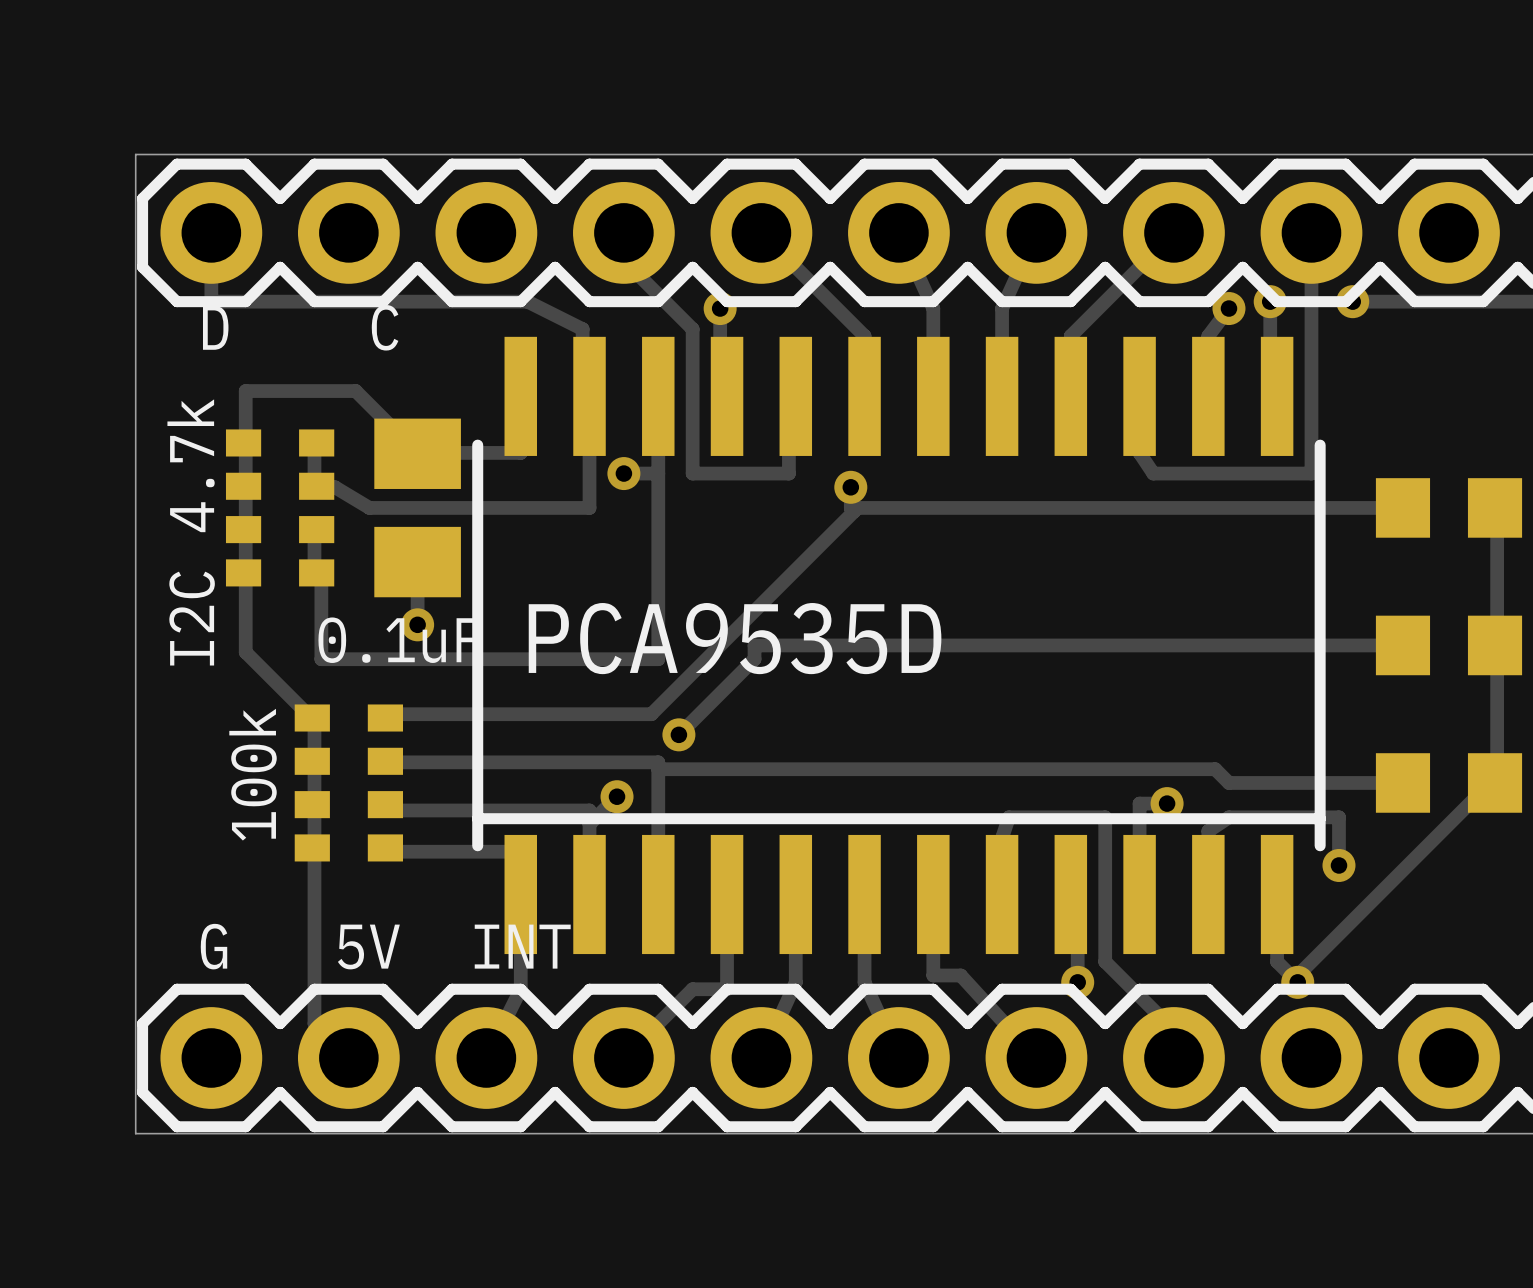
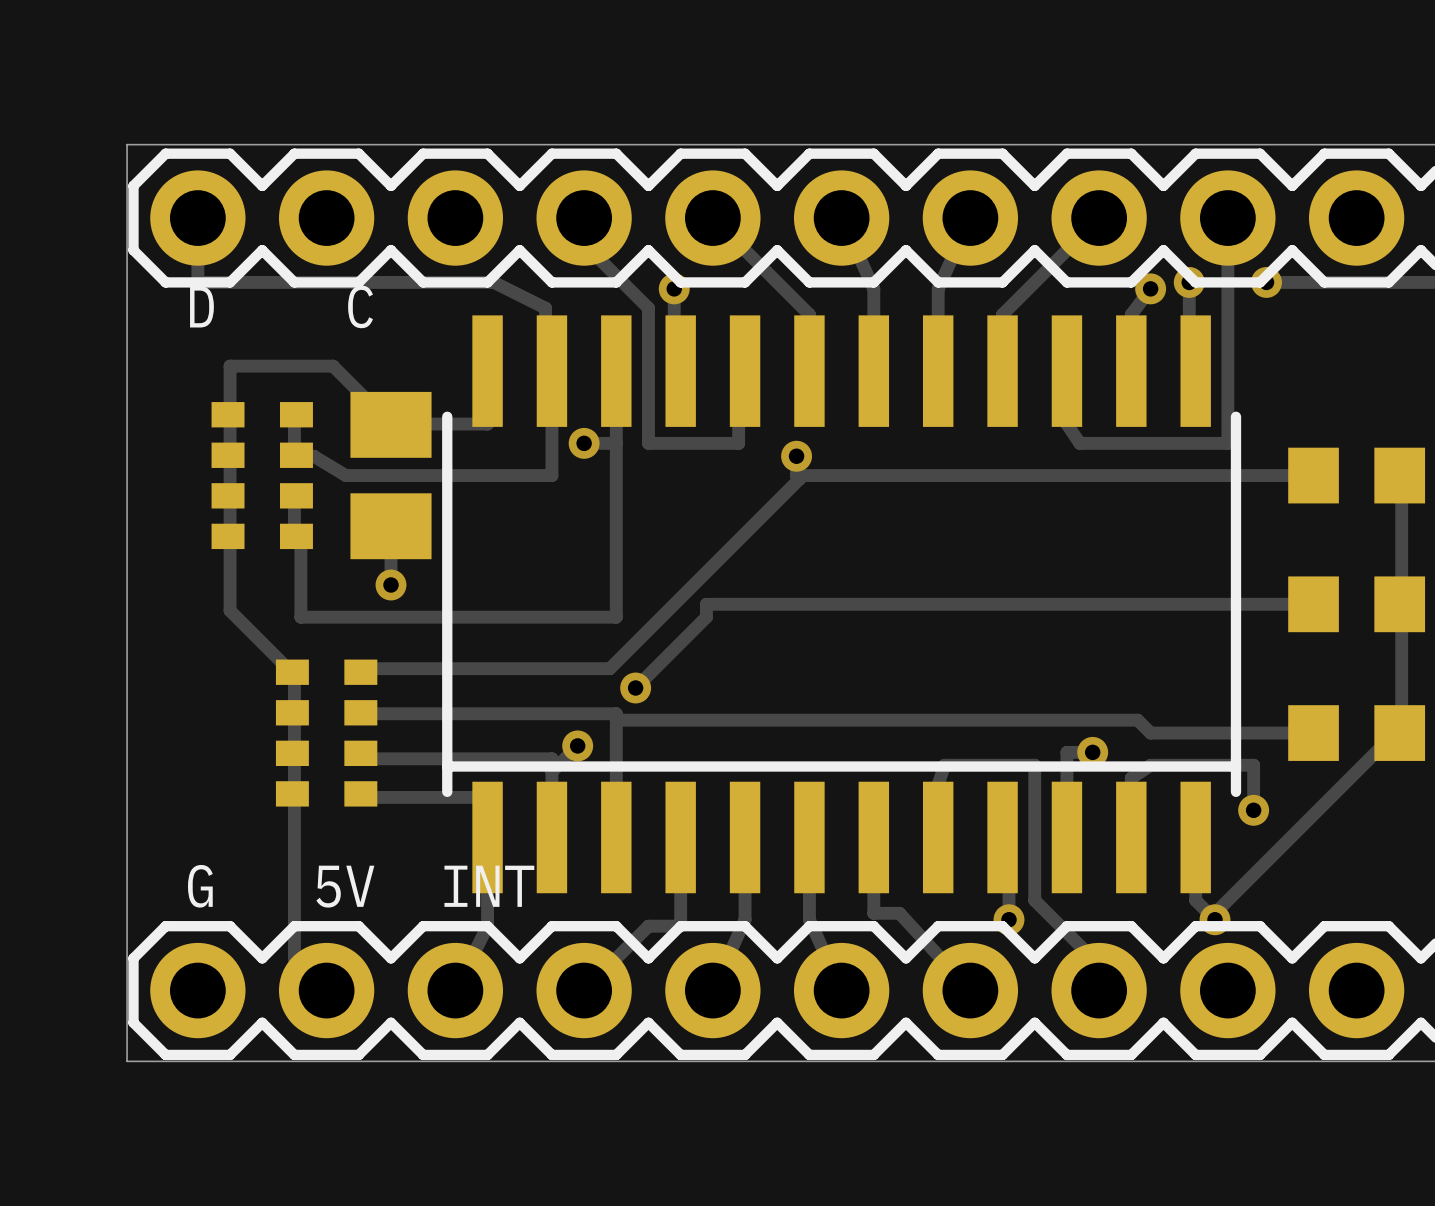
part value: I2C 4.7k (191, 532) -> none
part value: PCA9535D (735, 638) -> none
part value: 0.1uF (400, 640) -> none
part value: 100k (253, 774) -> none

